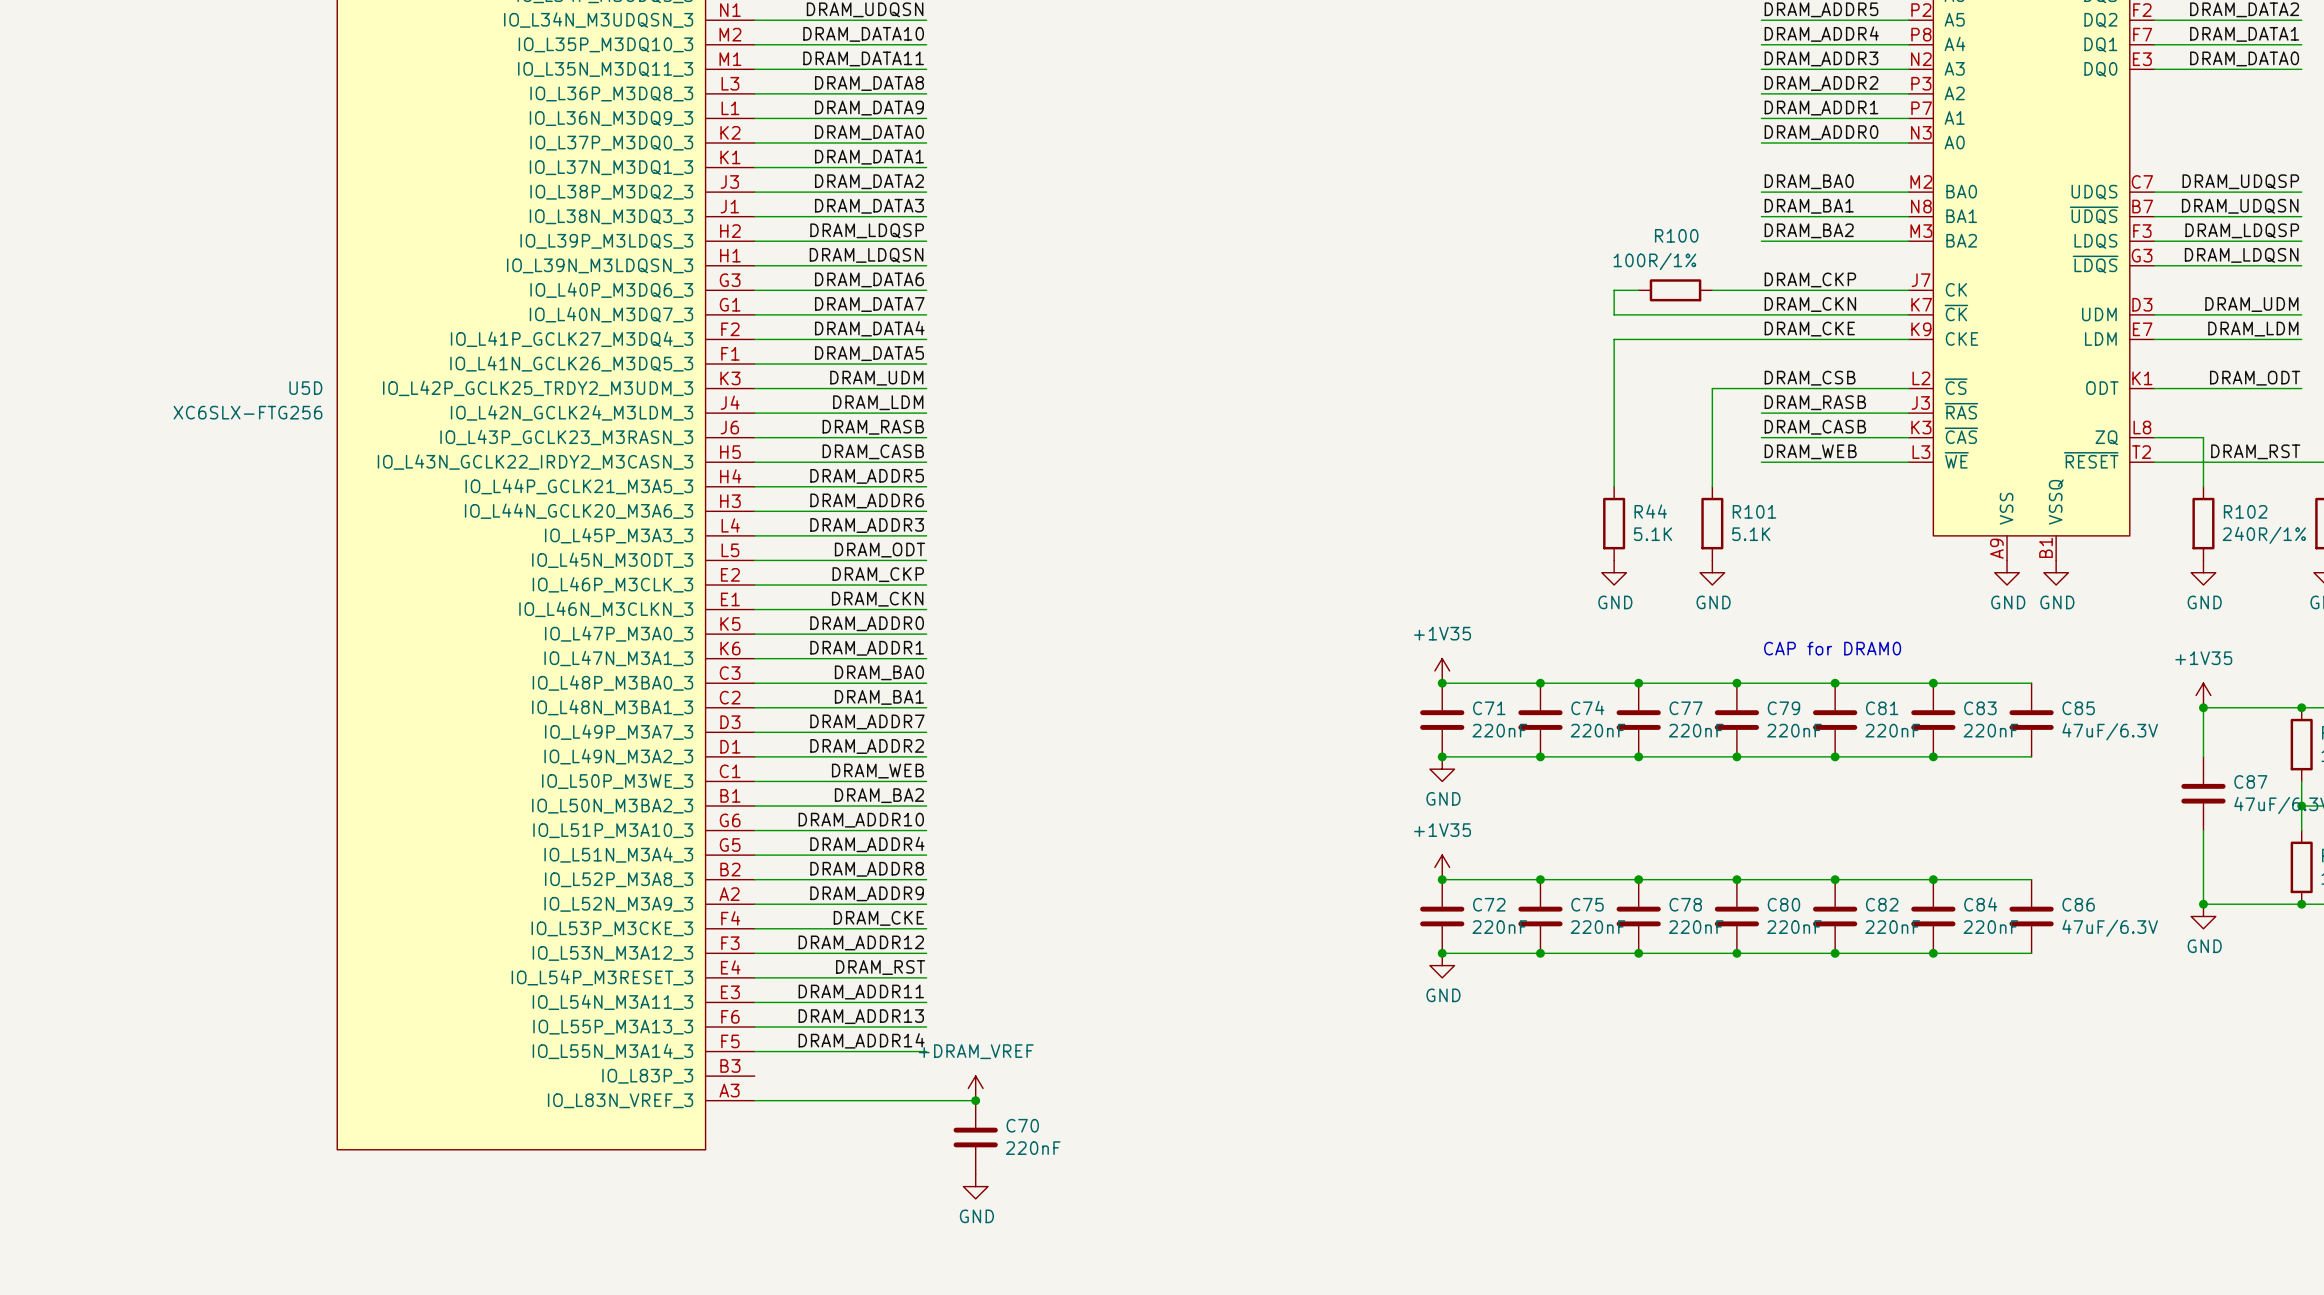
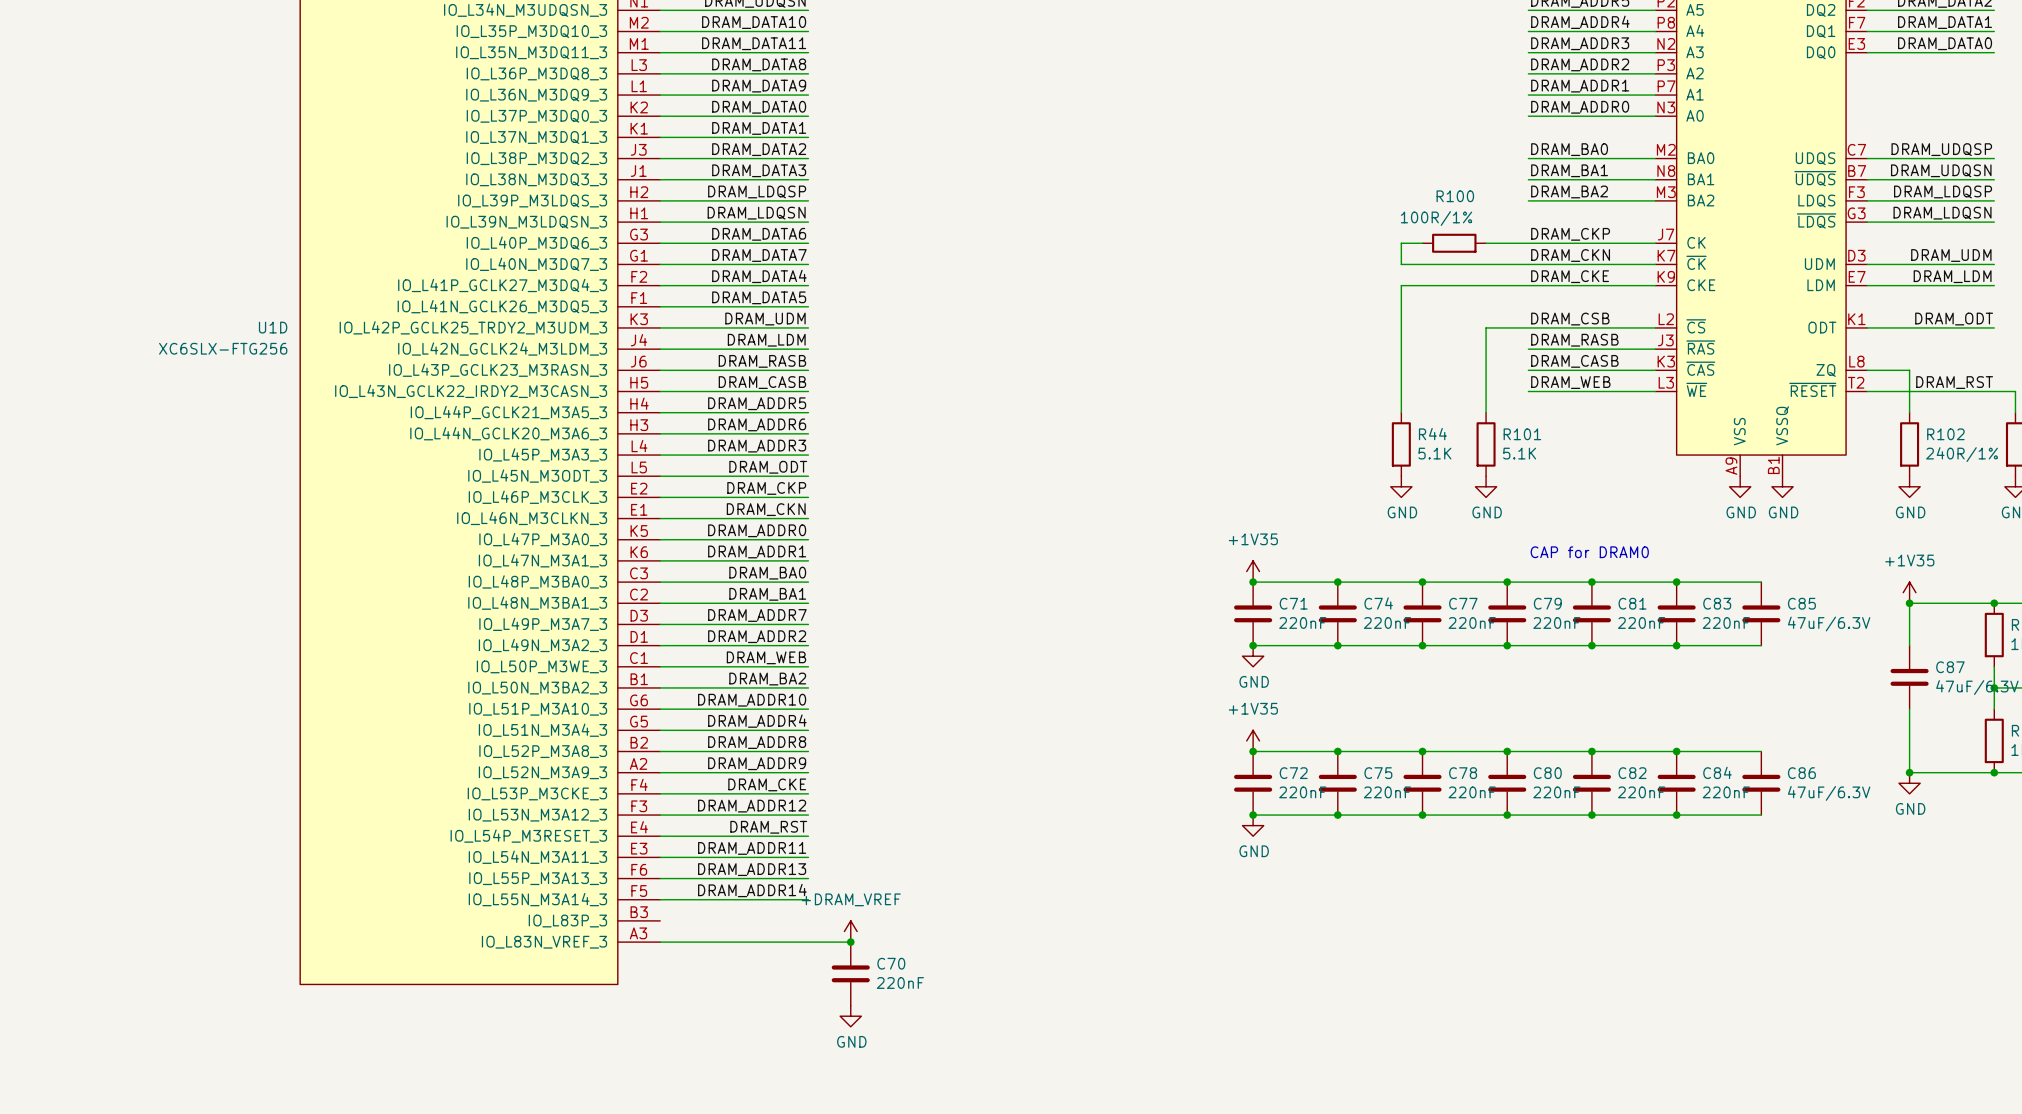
U5D name: U5D (305, 388) -> U1D (273, 327)

